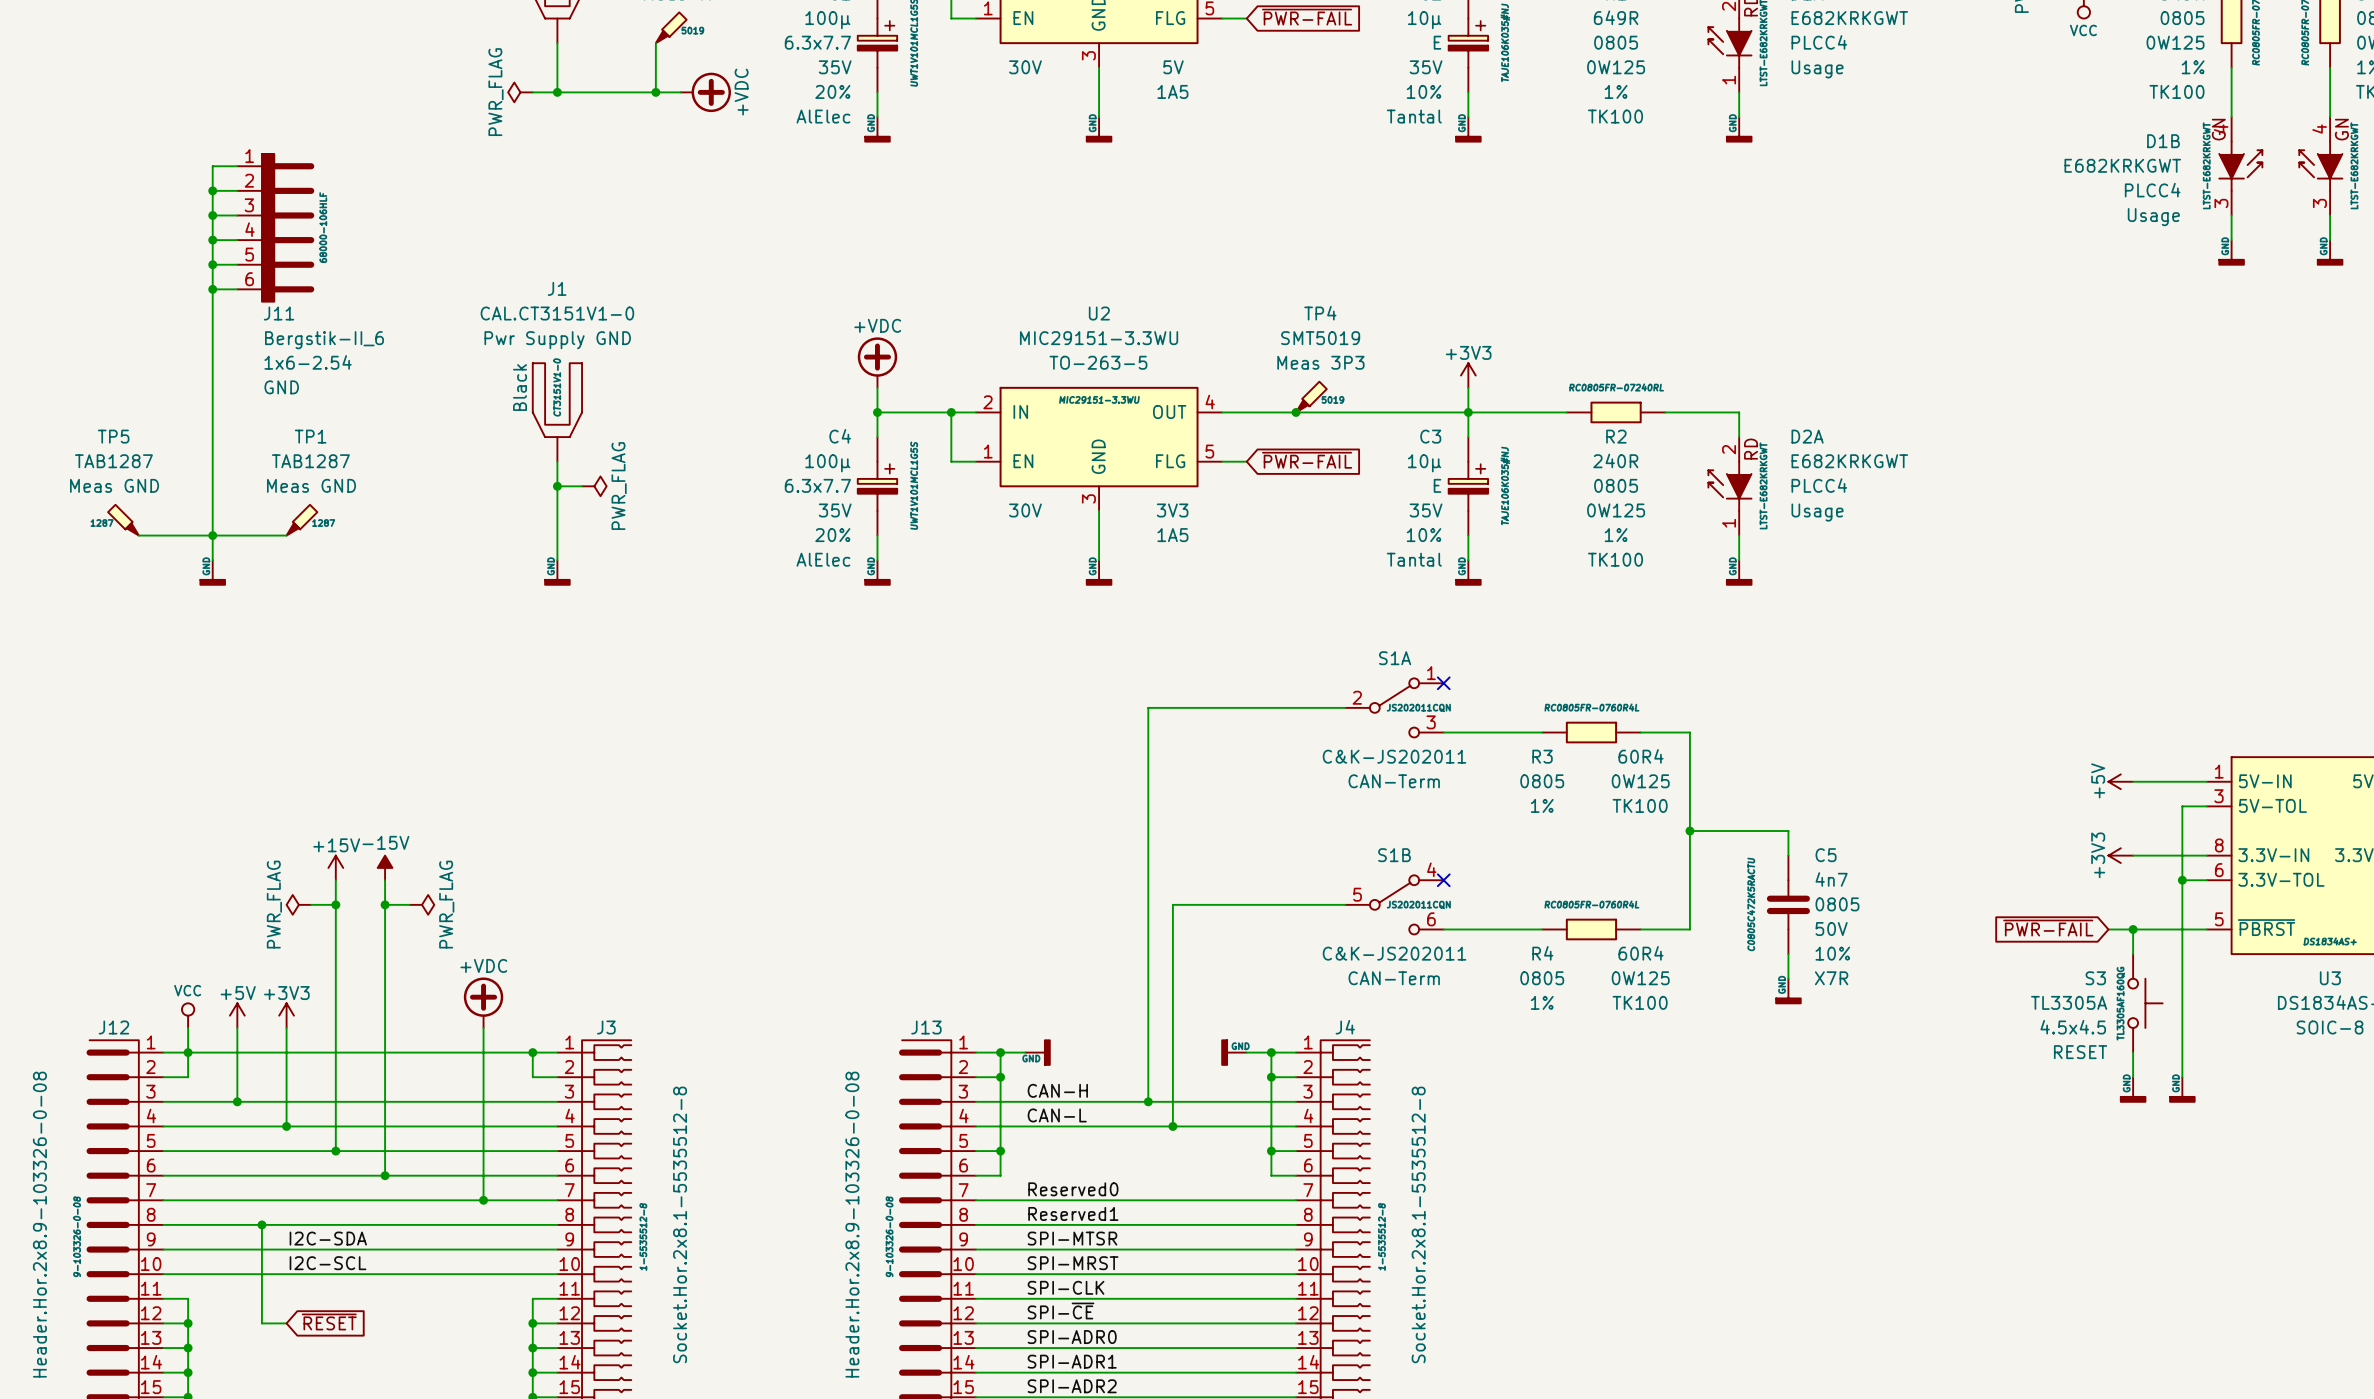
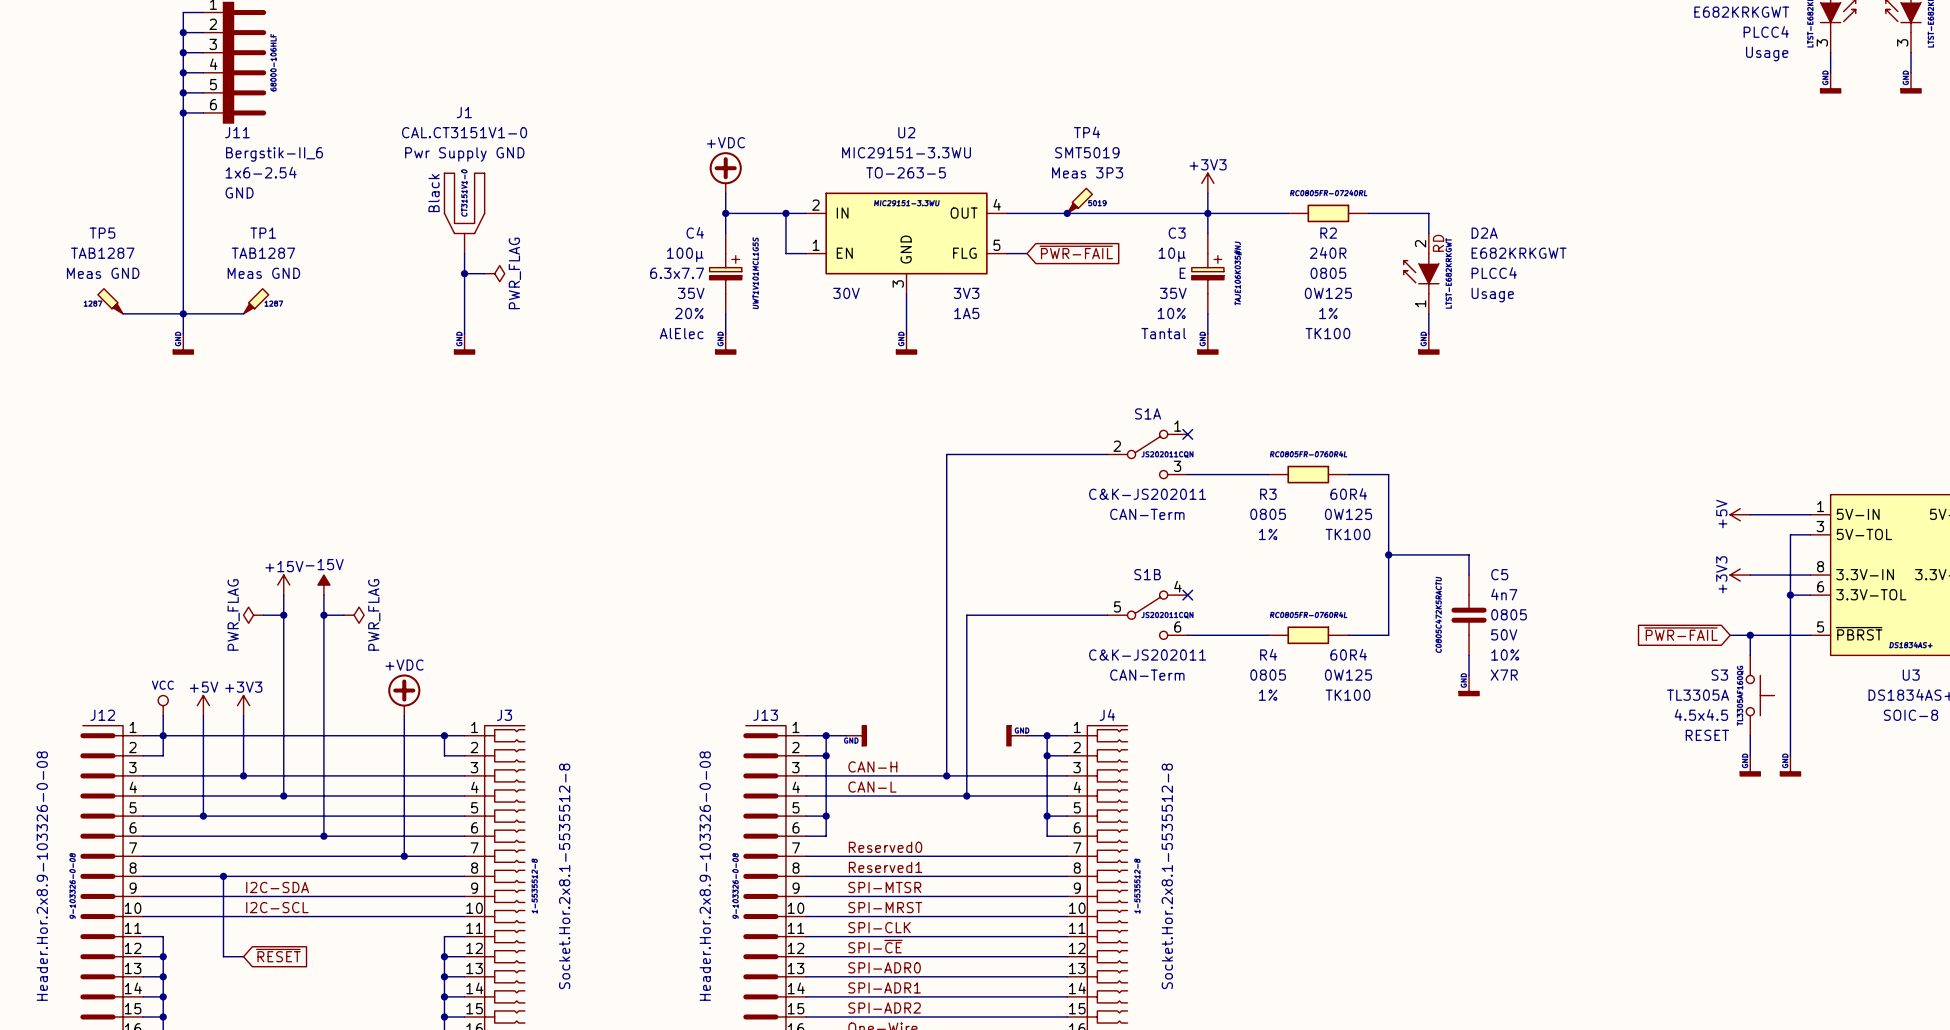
wire: none -> (203, 775) (203, 816)
junction: (237, 1101) -> none
wire: (286, 1101) (286, 1126) -> none
junction: none -> (243, 775)
junction: (286, 1126) -> none
wire: (335, 1126) (335, 1151) -> none
junction: none -> (283, 796)
junction: none -> (203, 816)
junction: (335, 1151) -> none

